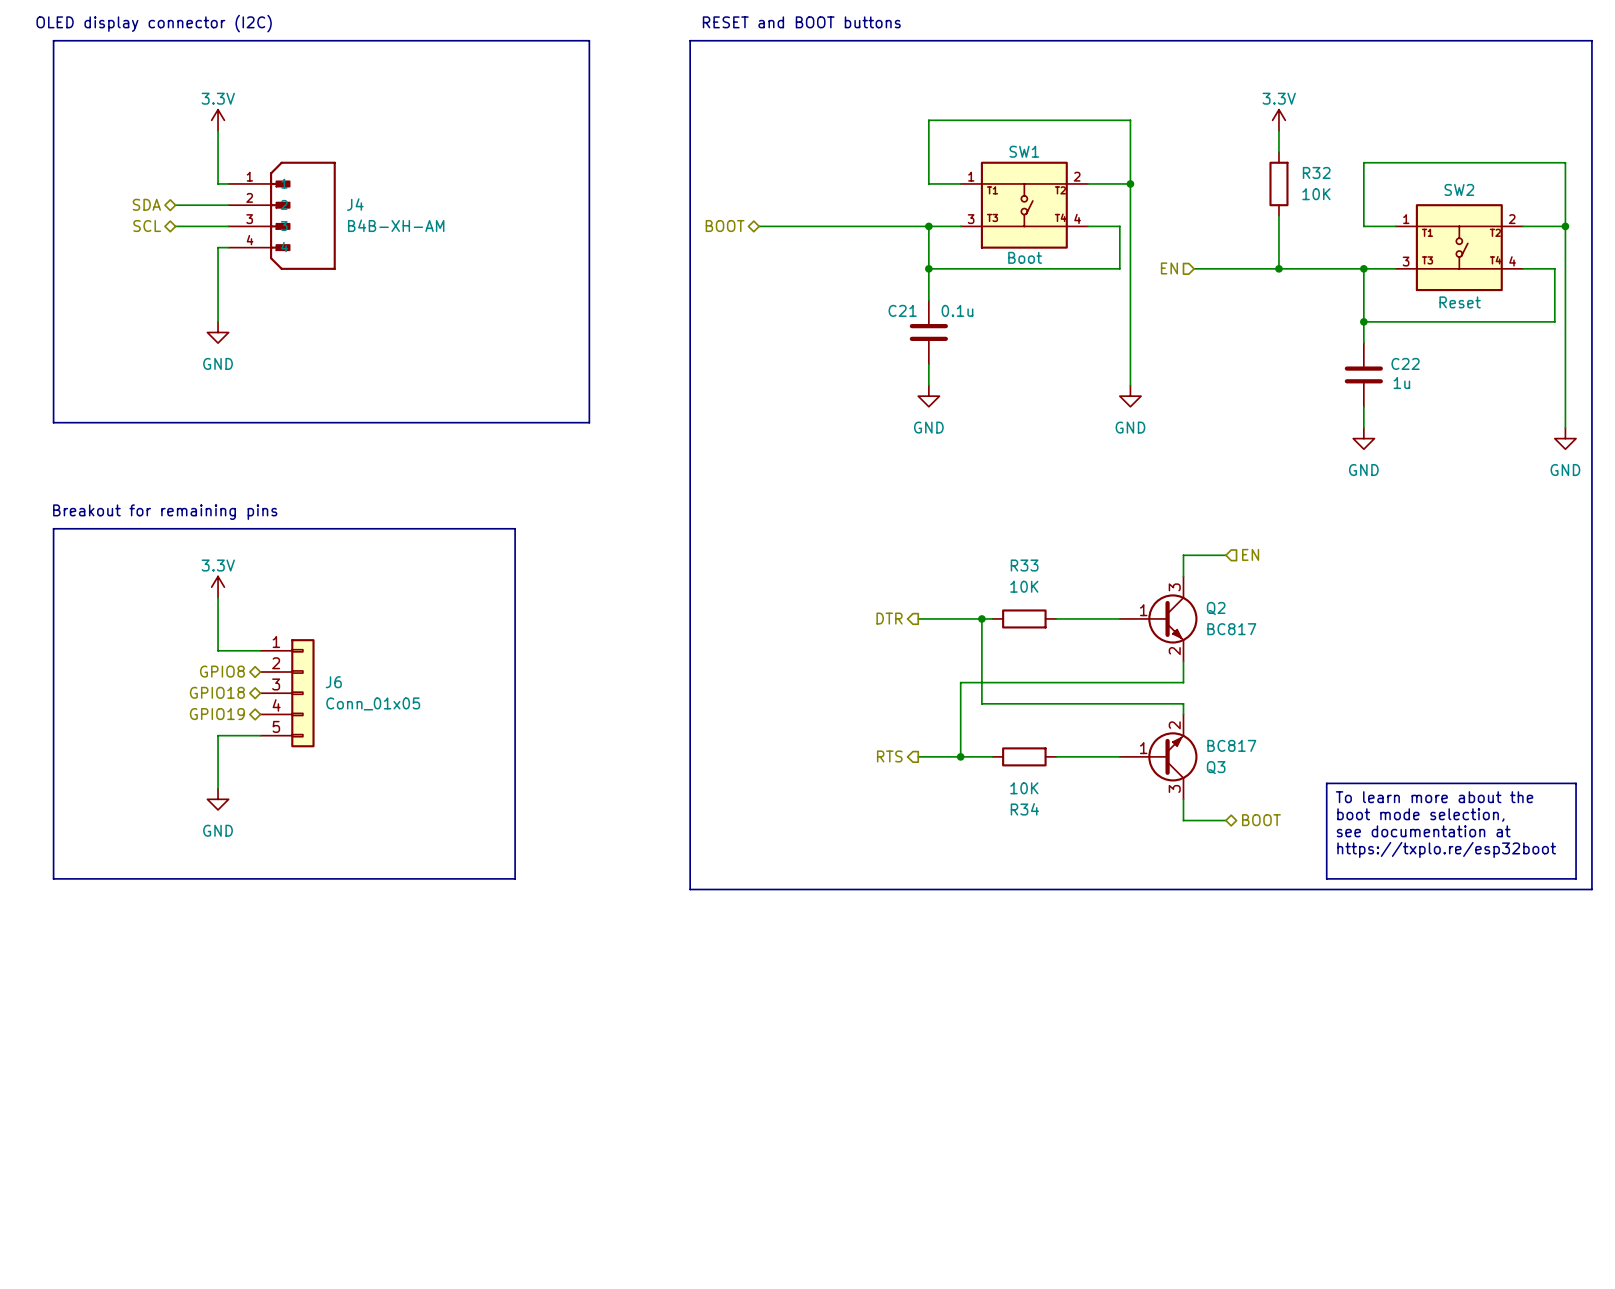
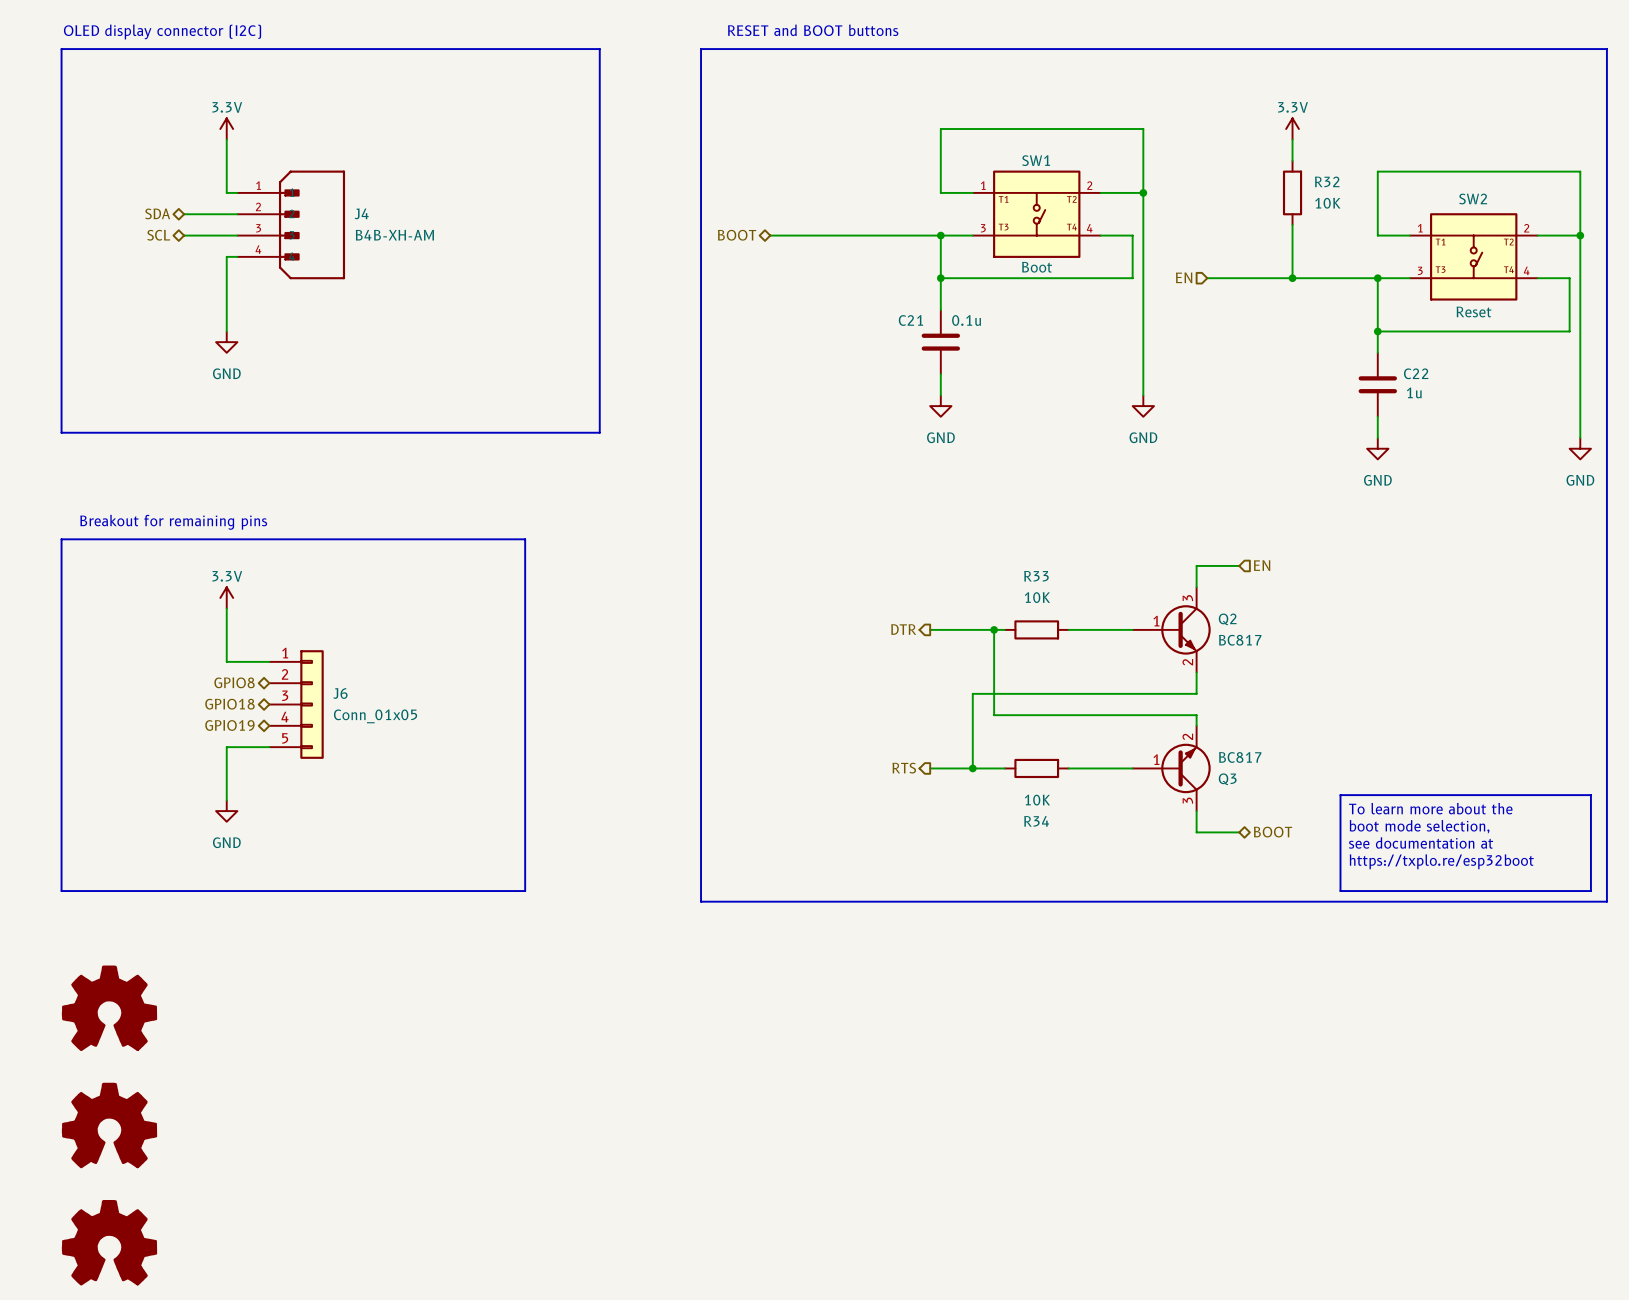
power symbol: none -> (109, 1008)
power symbol: none -> (109, 1125)
power symbol: none -> (109, 1242)

